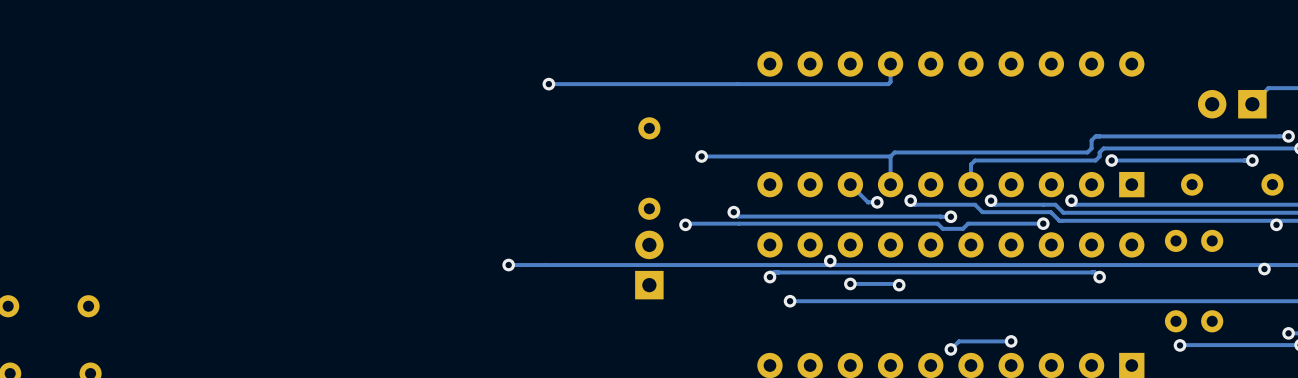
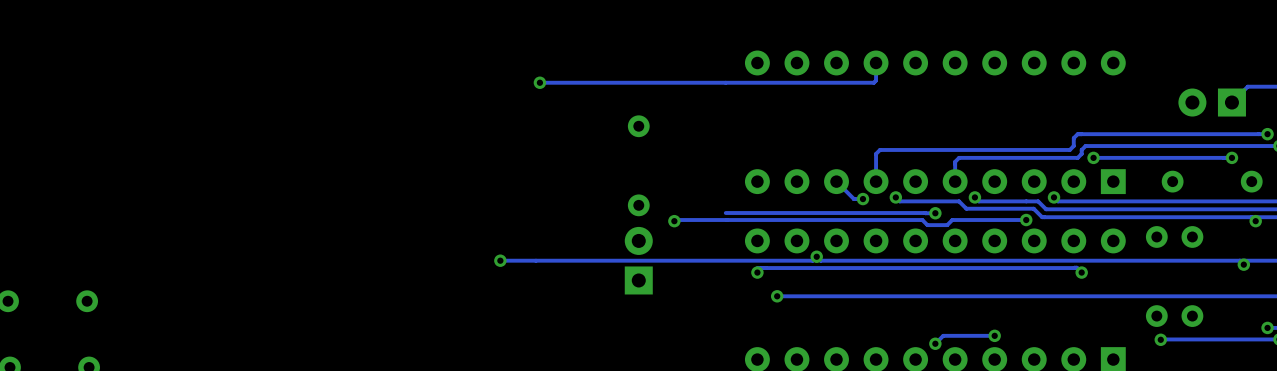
via: (701, 156) -> none
track: (890, 156) (701, 156) -> none
via: (733, 212) -> none
track: (850, 283) (899, 285) -> none
via: (850, 283) -> none
via: (899, 285) -> none

